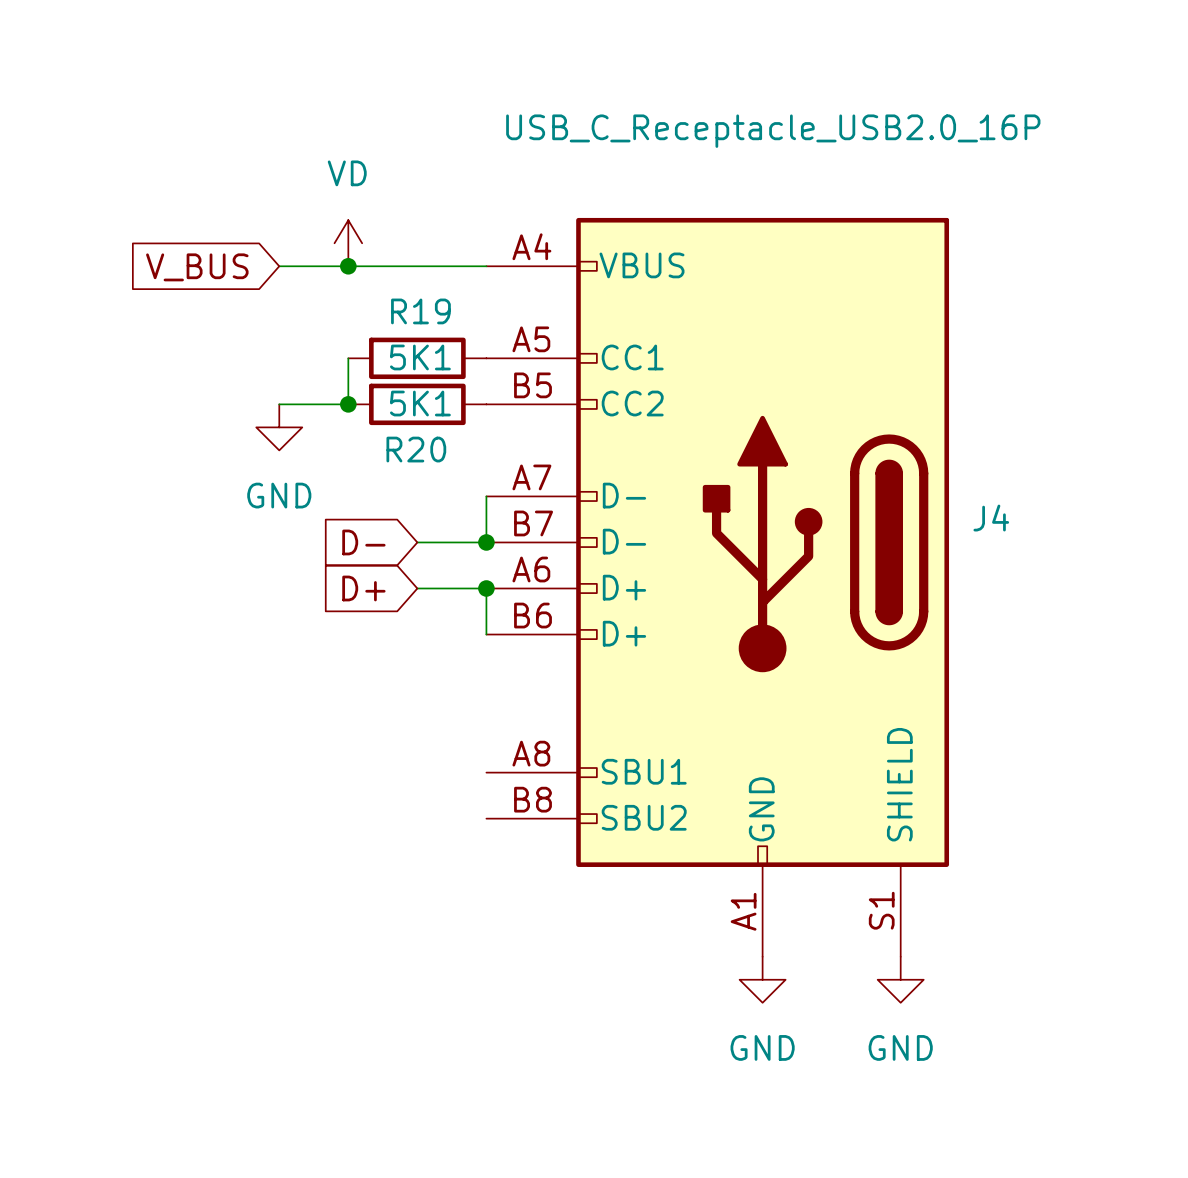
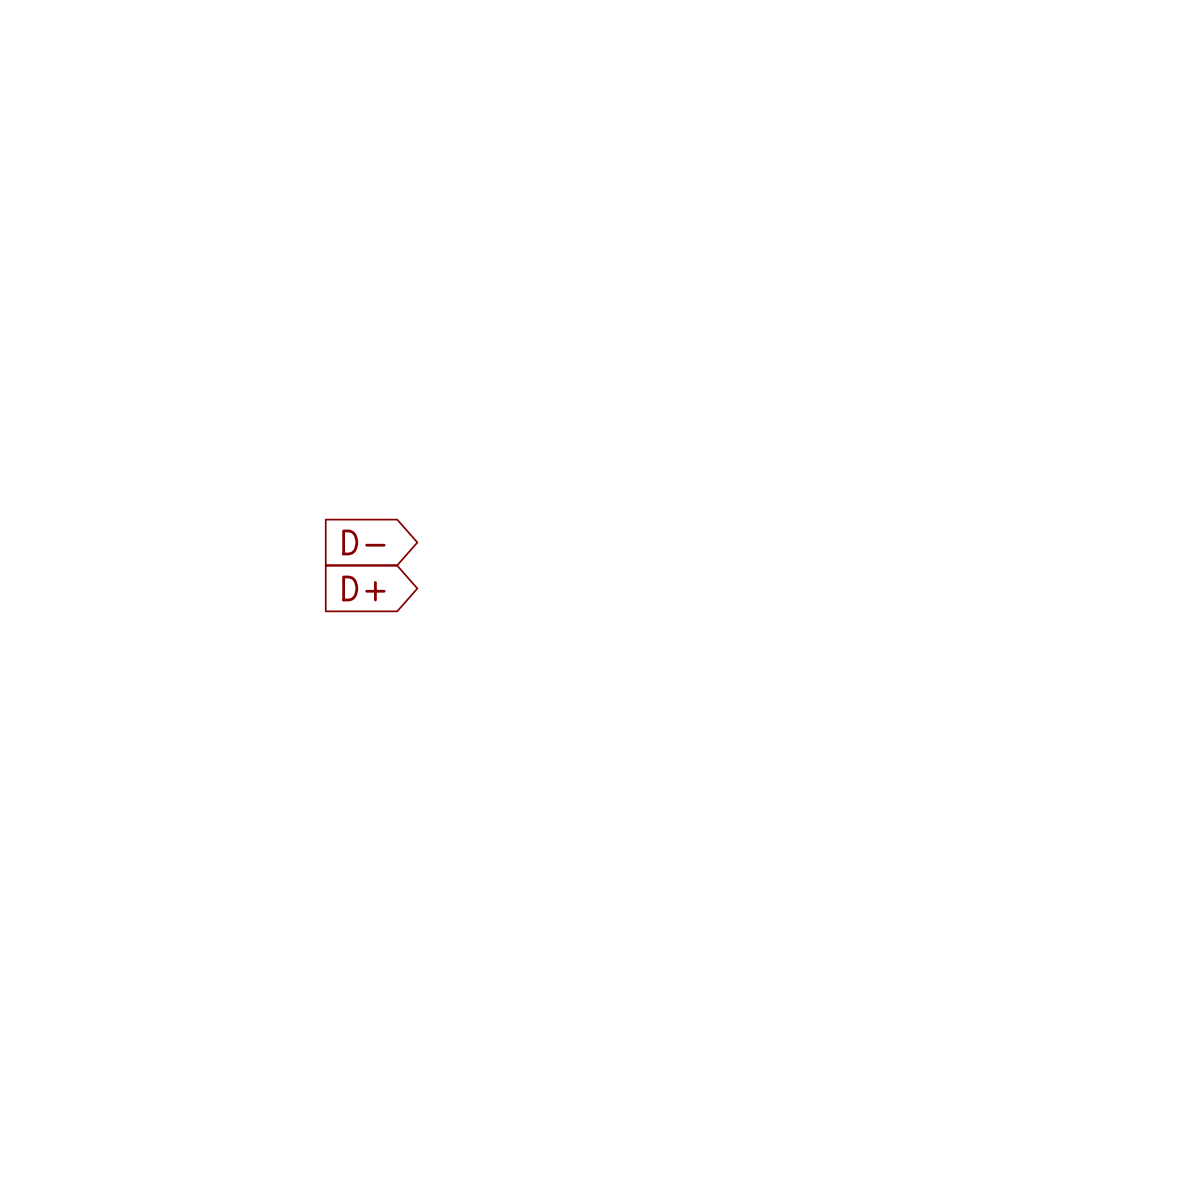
power symbol: VD (348, 243) -> none
wire: (279, 266) (486, 266) -> none
junction: (348, 266) -> none
global label: V_BUS (197, 267) -> none
wire: (348, 358) (348, 404) (279, 404) -> none
R19: 5K1 (417, 358) -> none
junction: (348, 404) -> none
R20: 5K1 (417, 404) -> none
power symbol: GND (279, 427) -> none
wire: (486, 496) (486, 542) (417, 542) -> none
junction: (486, 542) -> none
J4: USB_C_Receptacle_USB2.0_16P (717, 587) -> none
wire: (417, 588) (486, 588) (486, 634) -> none
junction: (486, 588) -> none
power symbol: GND (762, 979) -> none
power symbol: GND (900, 979) -> none

